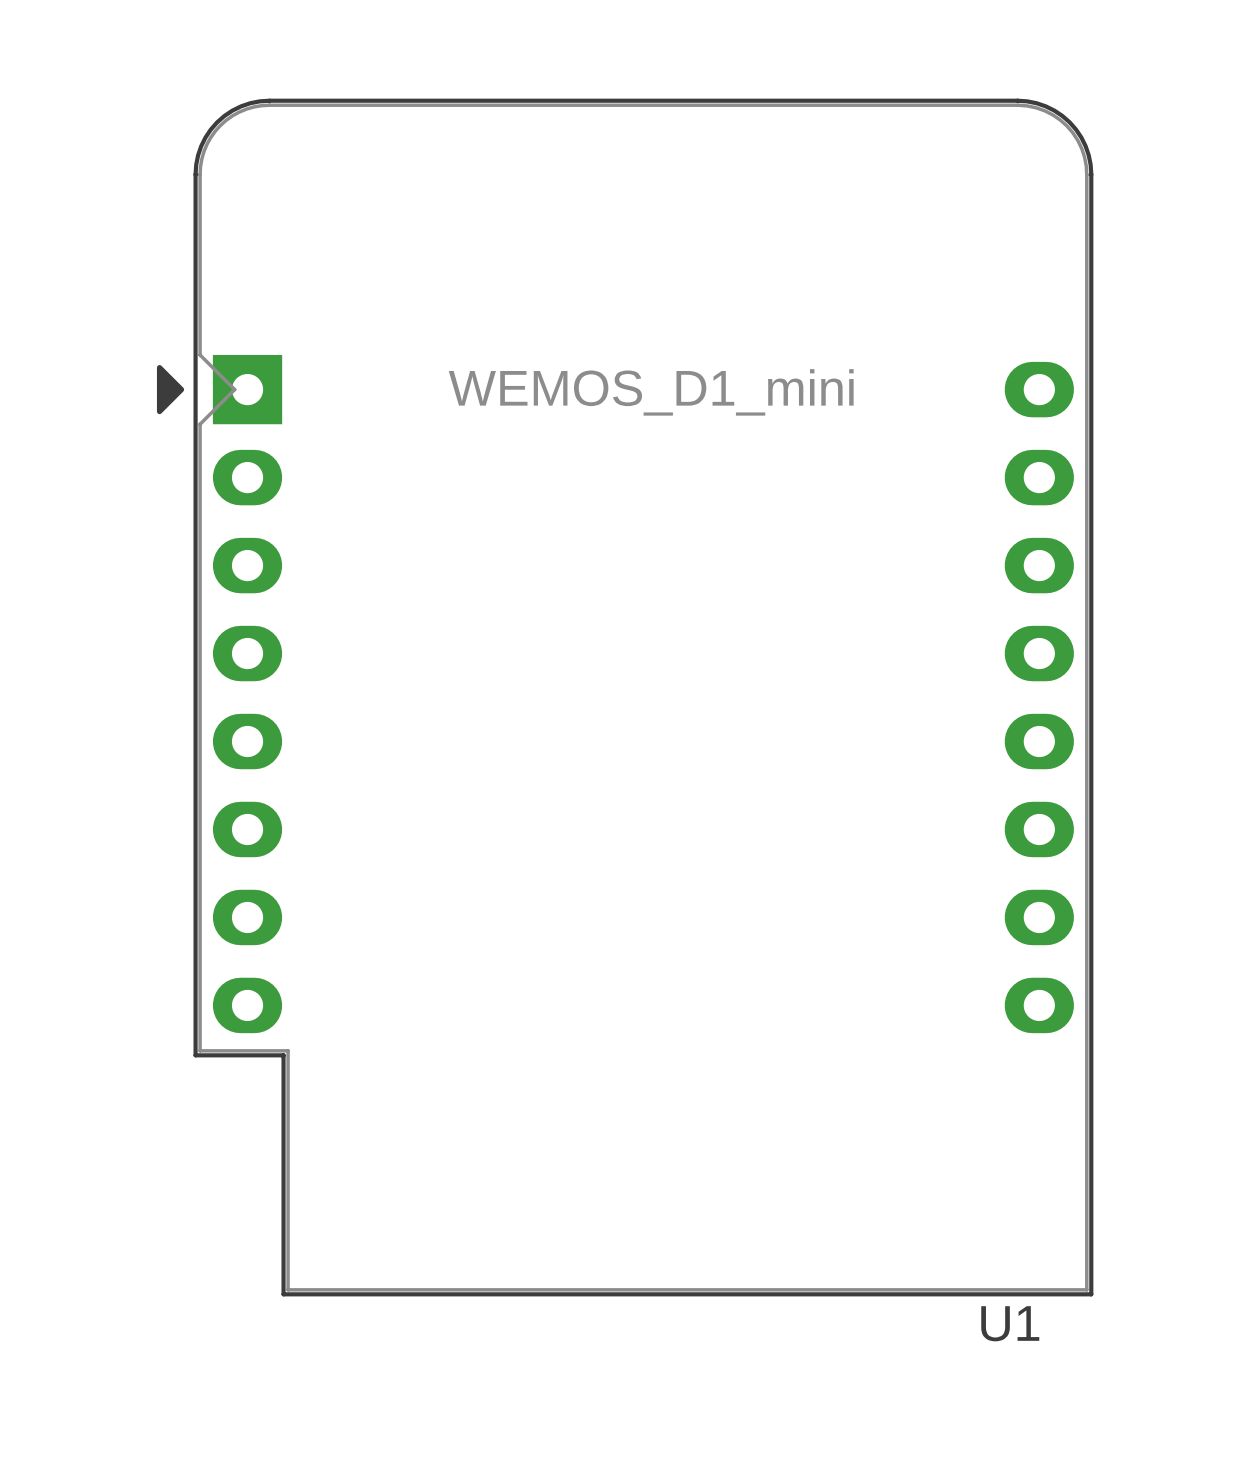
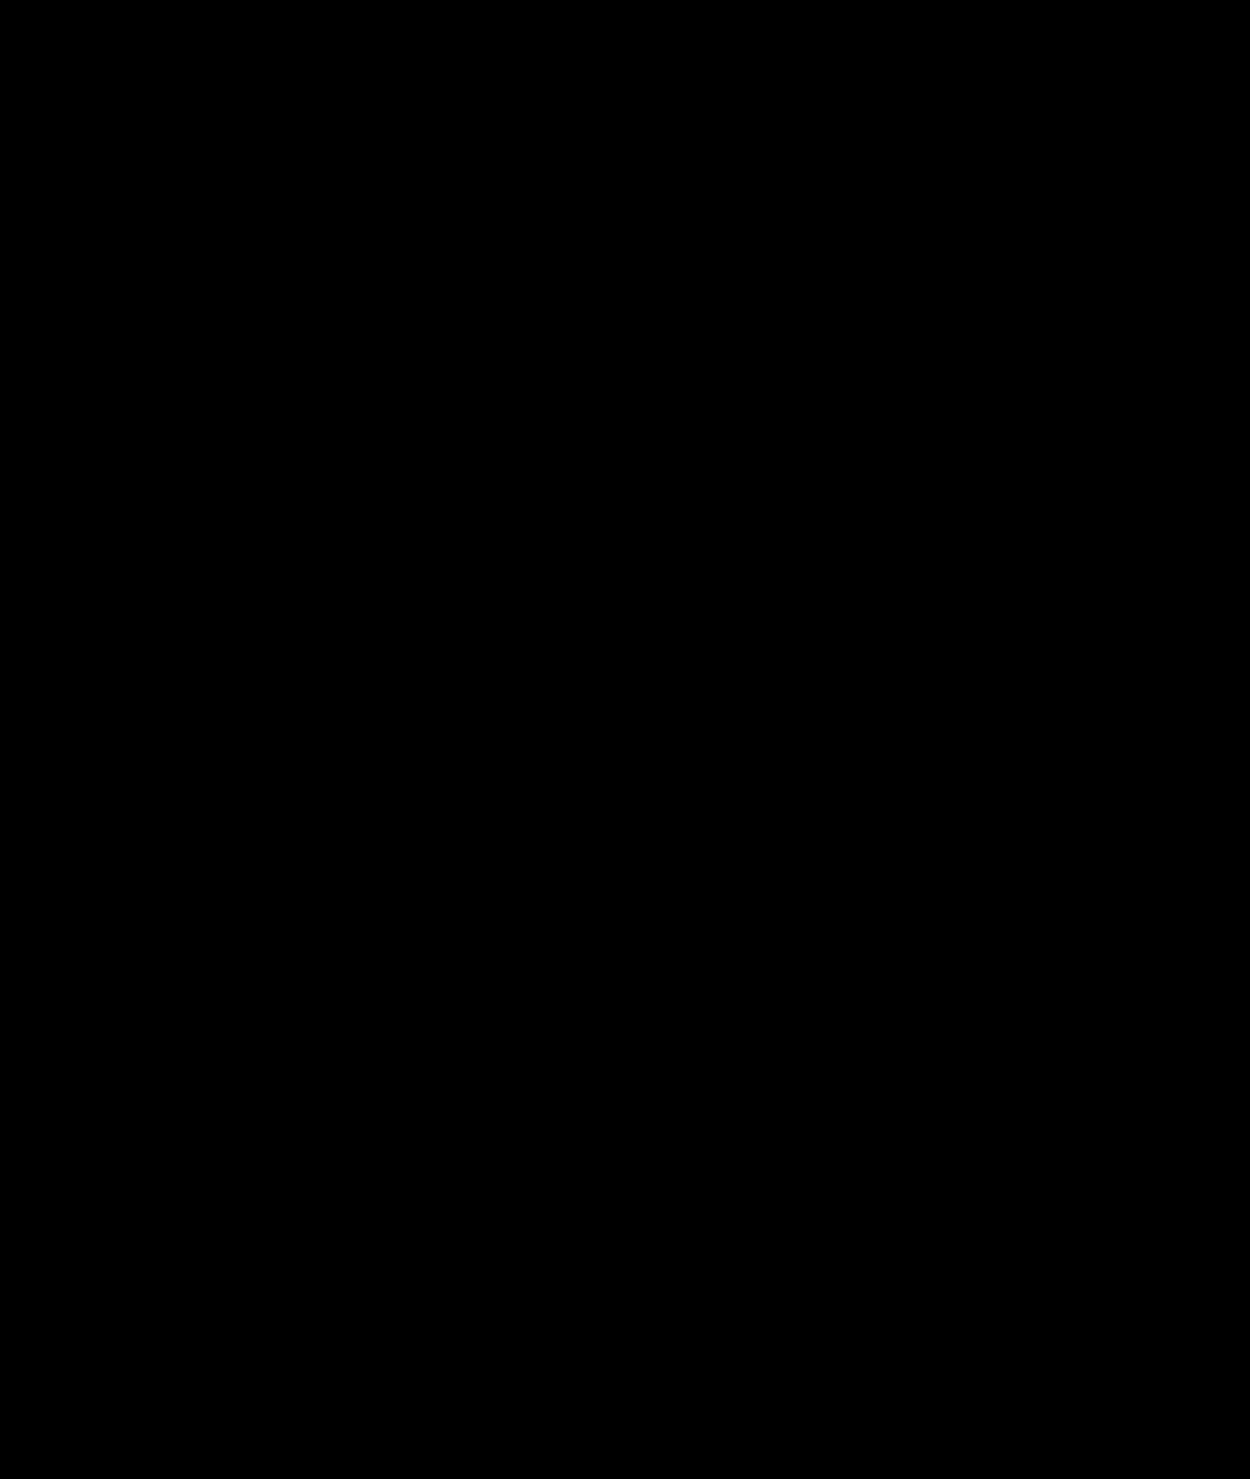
U1: WEMOS_D1_mini (625, 697) -> none

